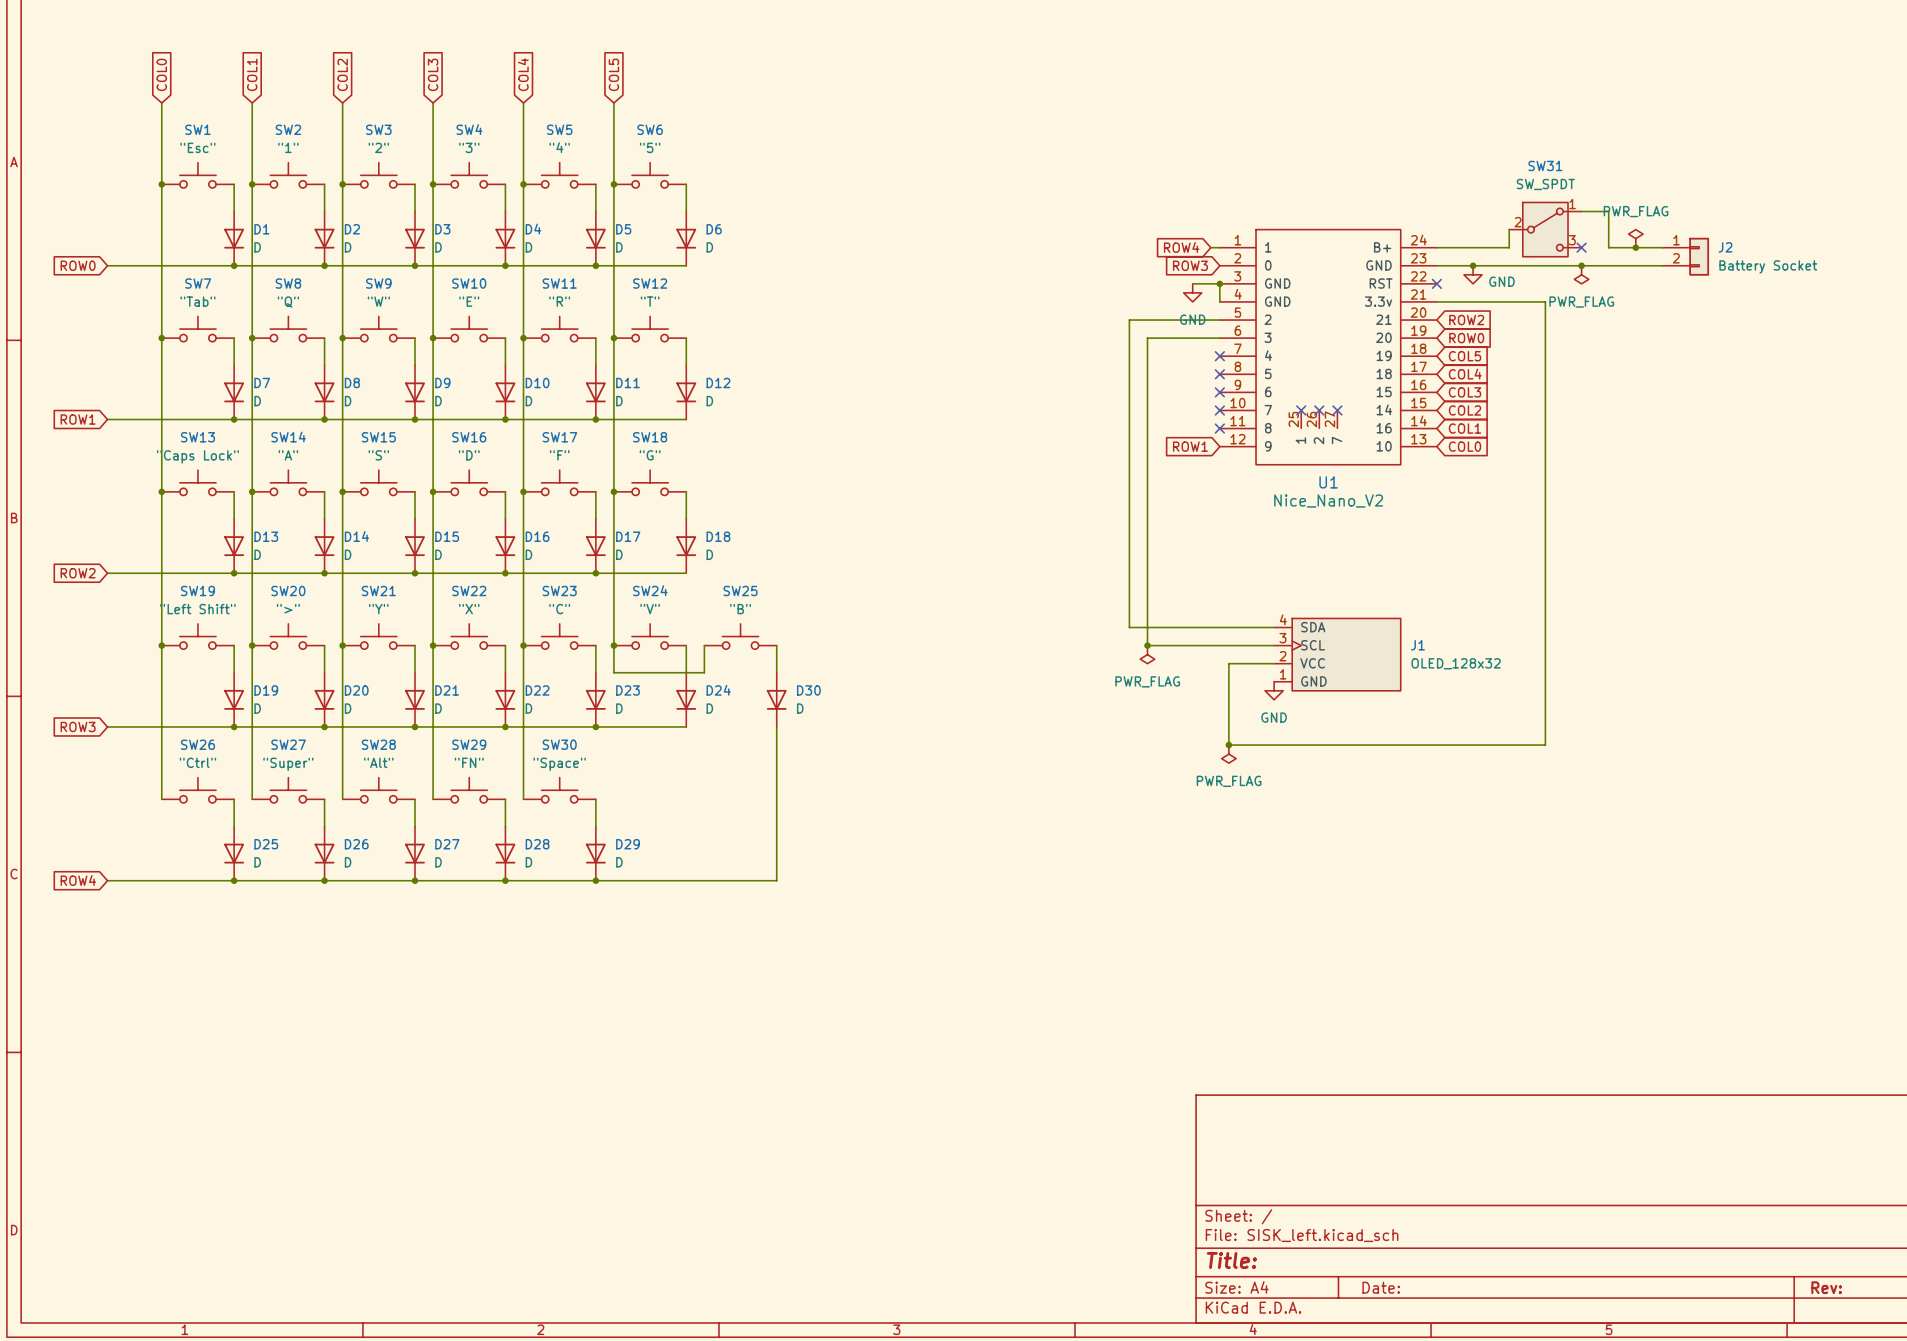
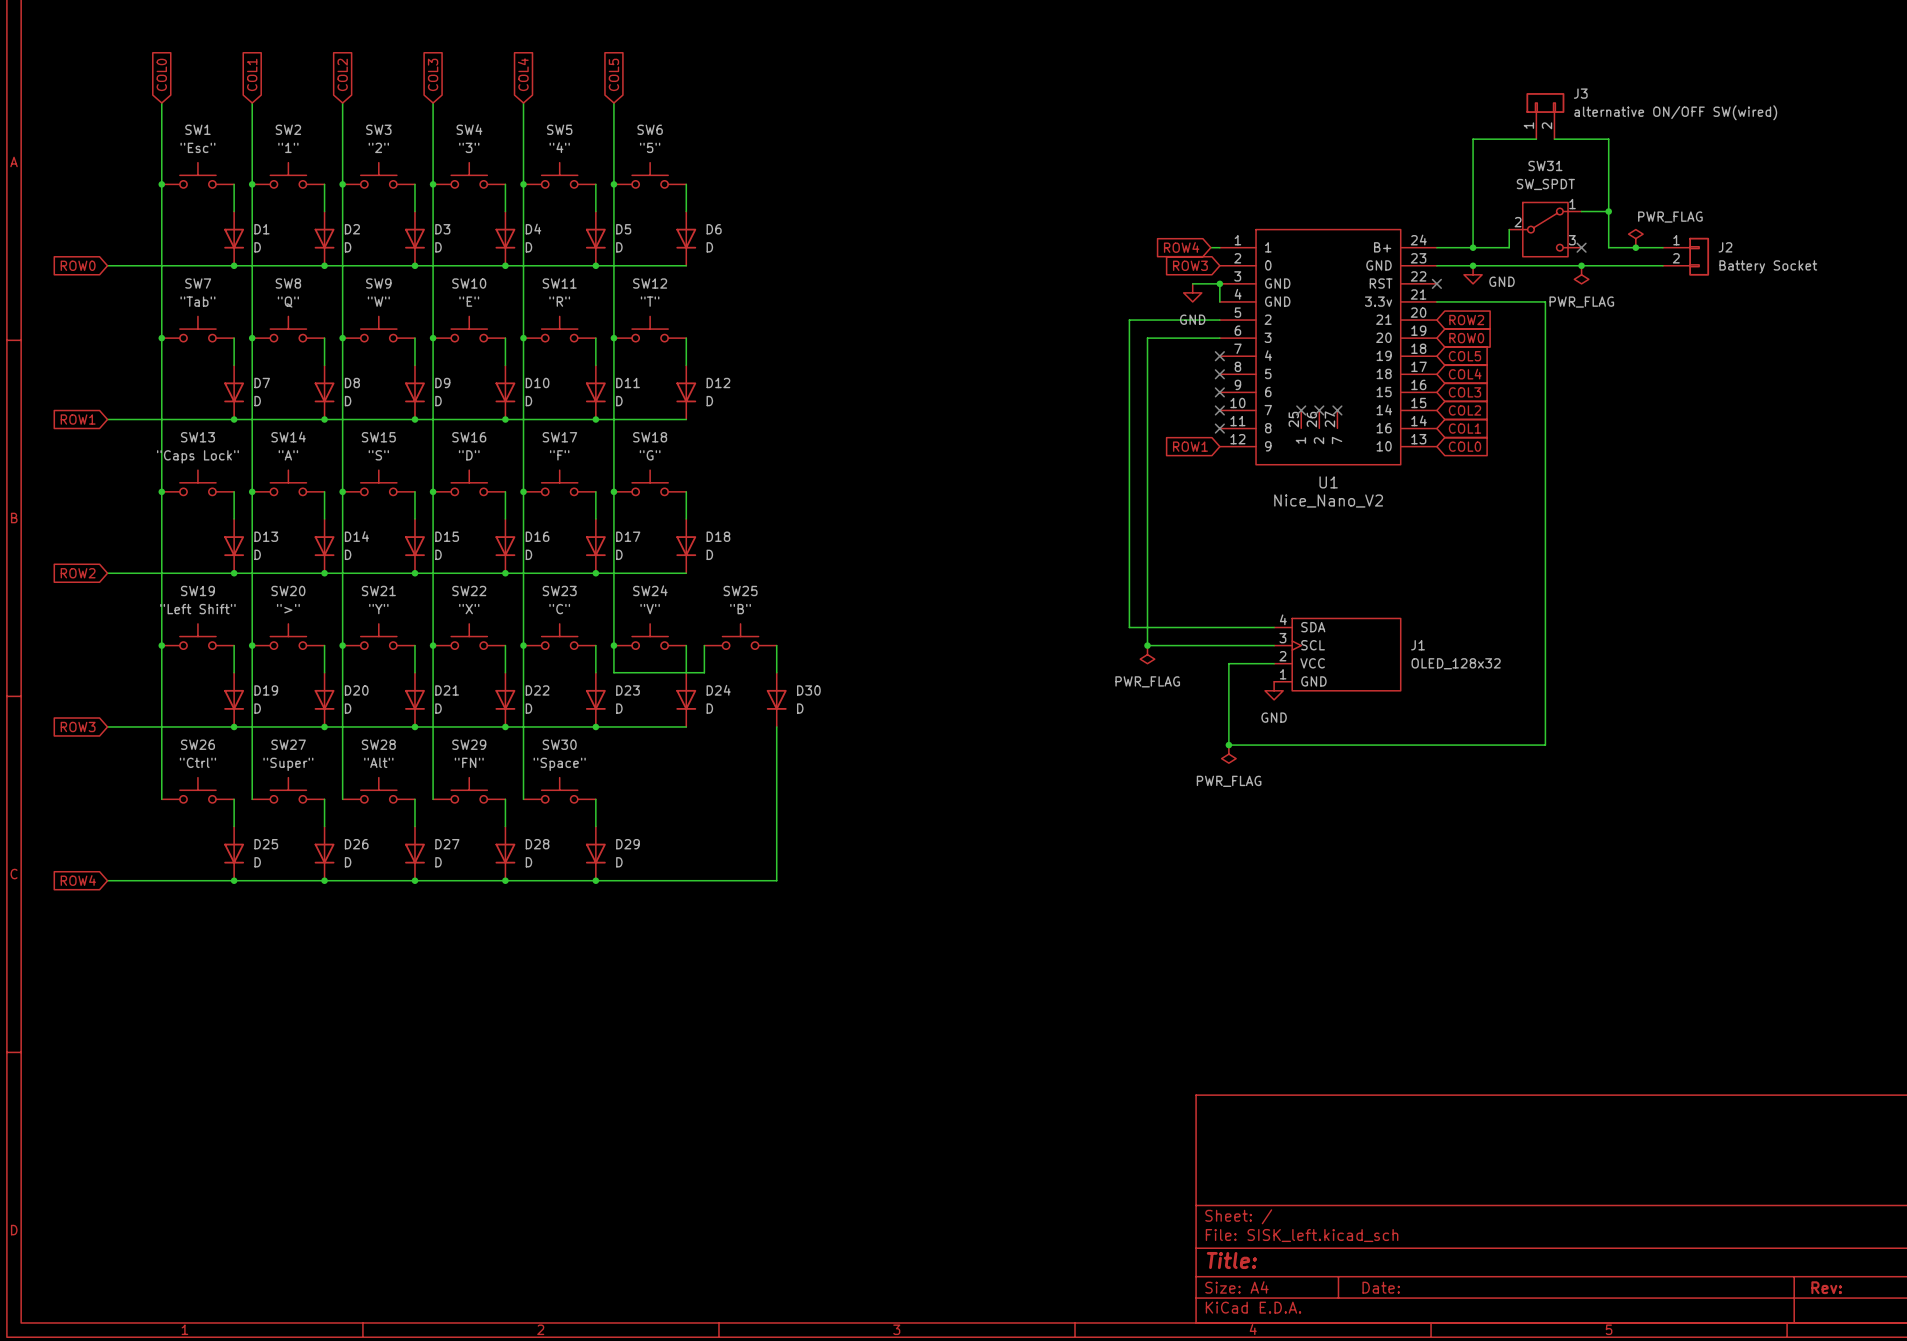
J3: none -> alternative ON/OFF SW(wired) (1545, 116)
wire: none -> (1536, 139) (1473, 139) (1473, 247)
wire: none -> (1554, 139) (1608, 139) (1608, 211)
junction: none -> (1608, 211)
power symbol text position: PWR_FLAG (1636, 211) -> PWR_FLAG (1670, 217)
junction: none -> (1473, 247)

